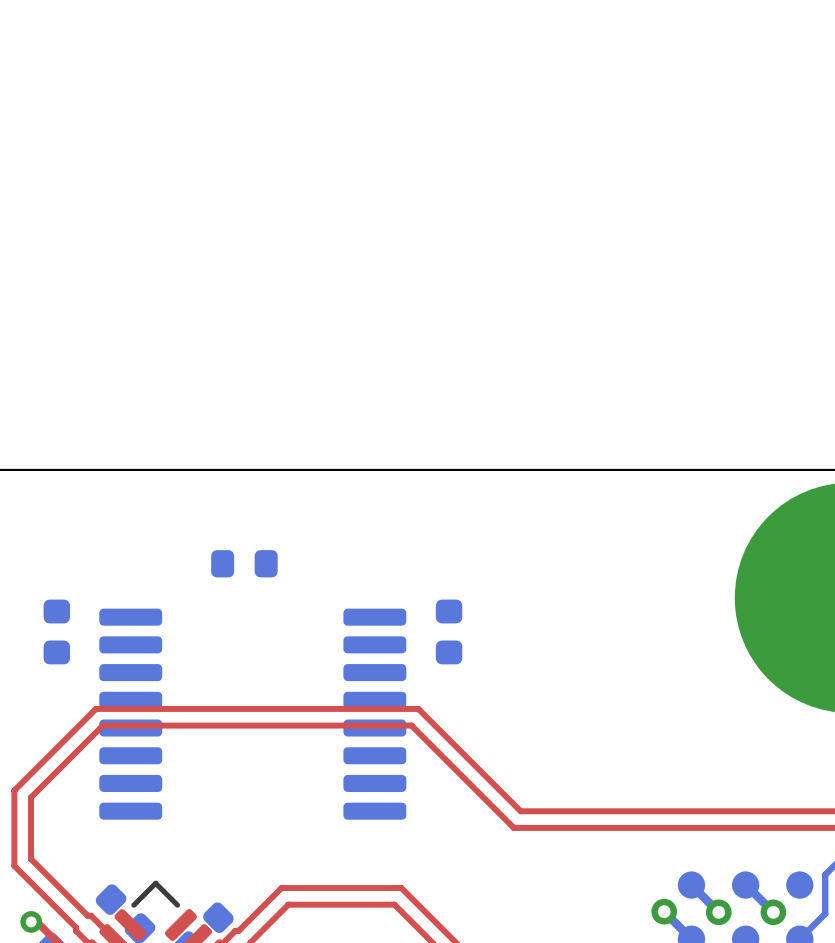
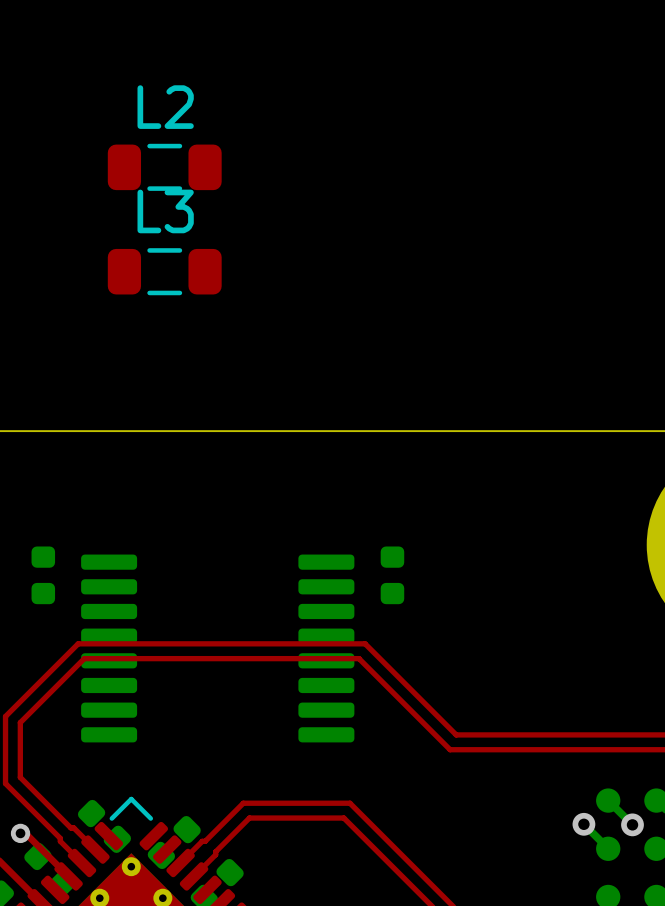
L2: none -> (164, 167)
L3: none -> (164, 271)
part: (244, 563) -> none

